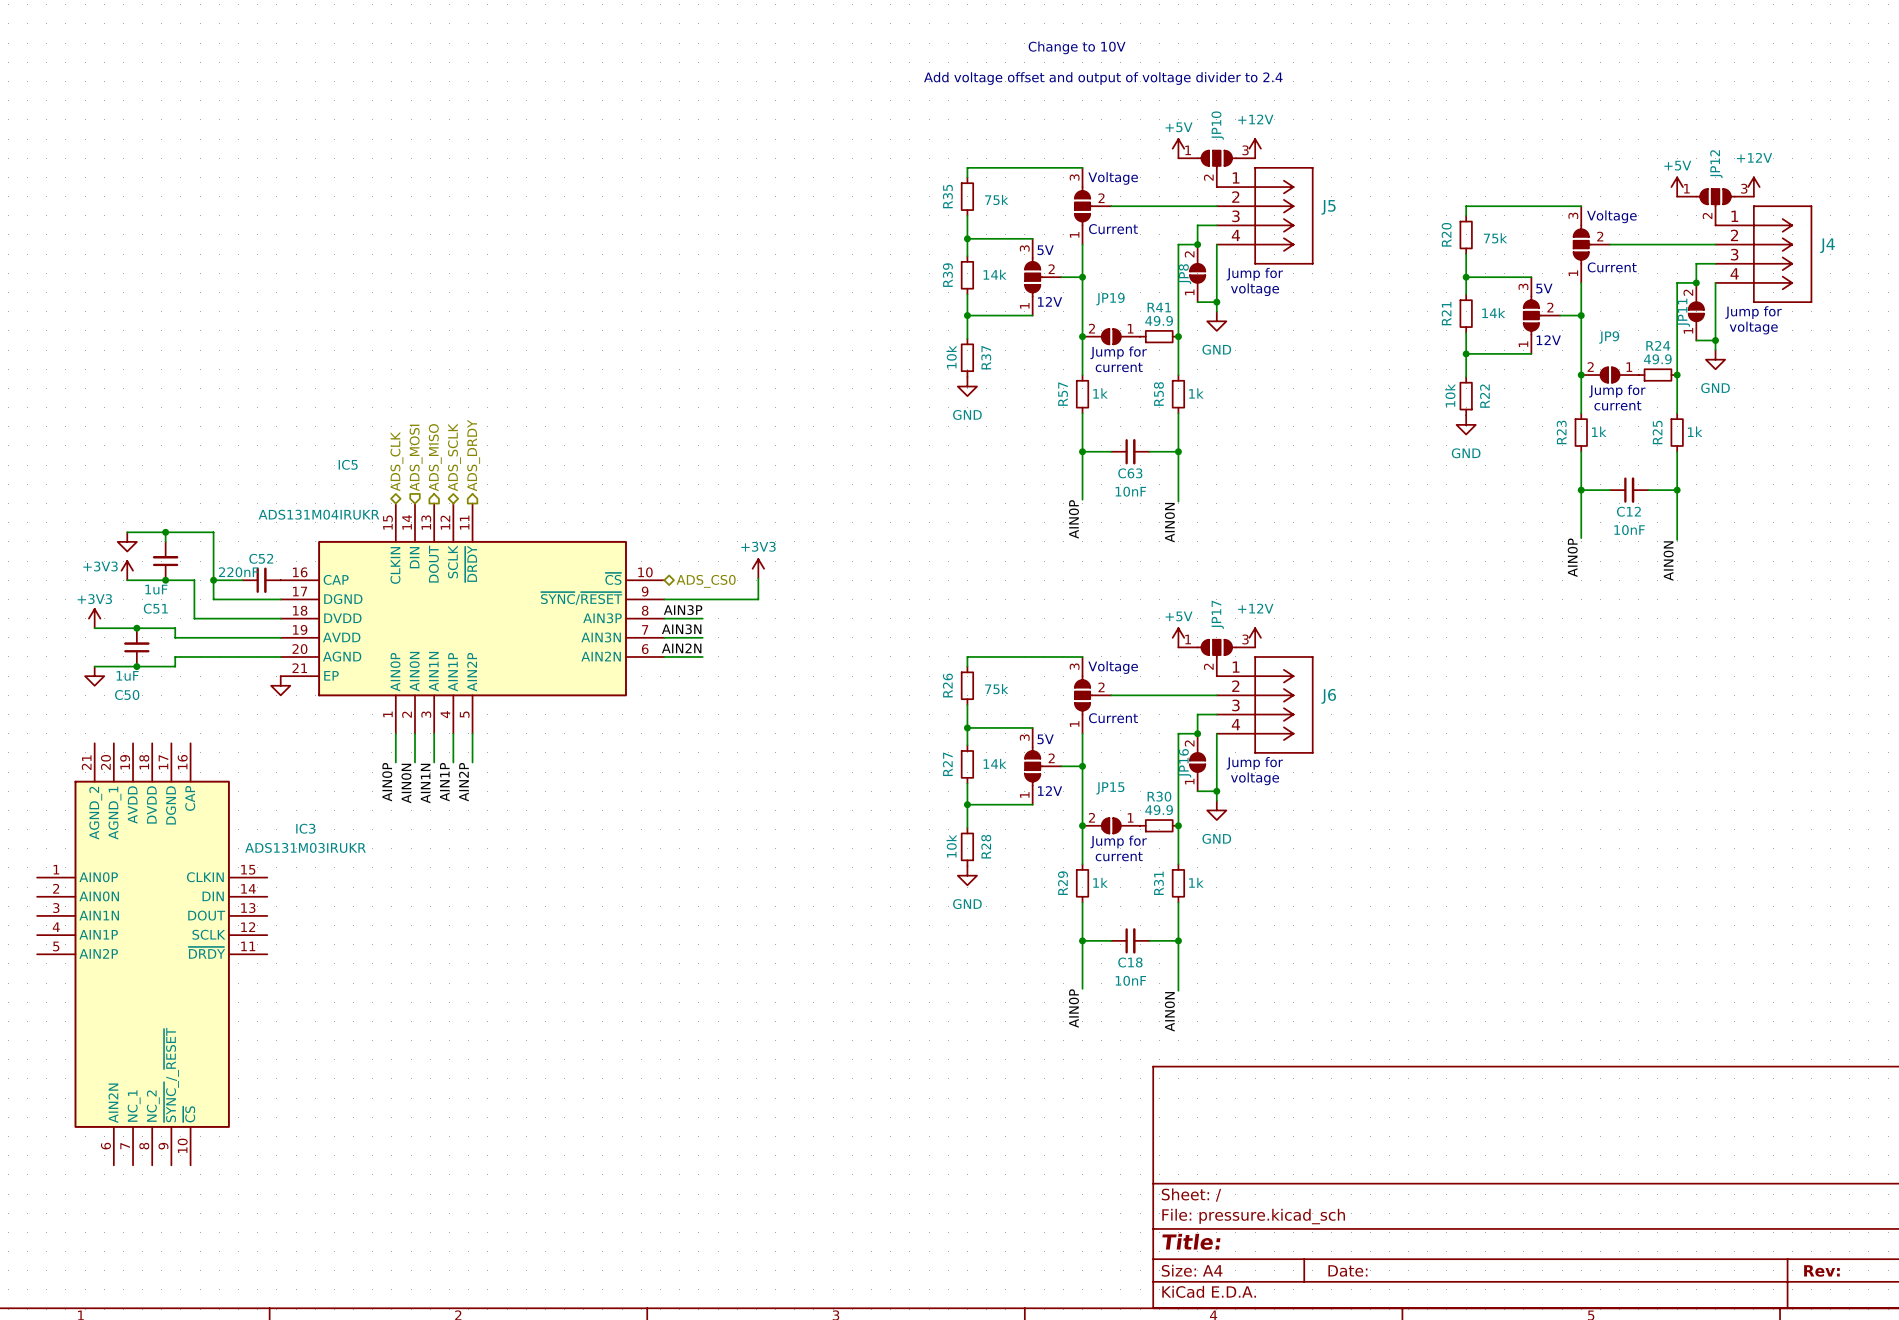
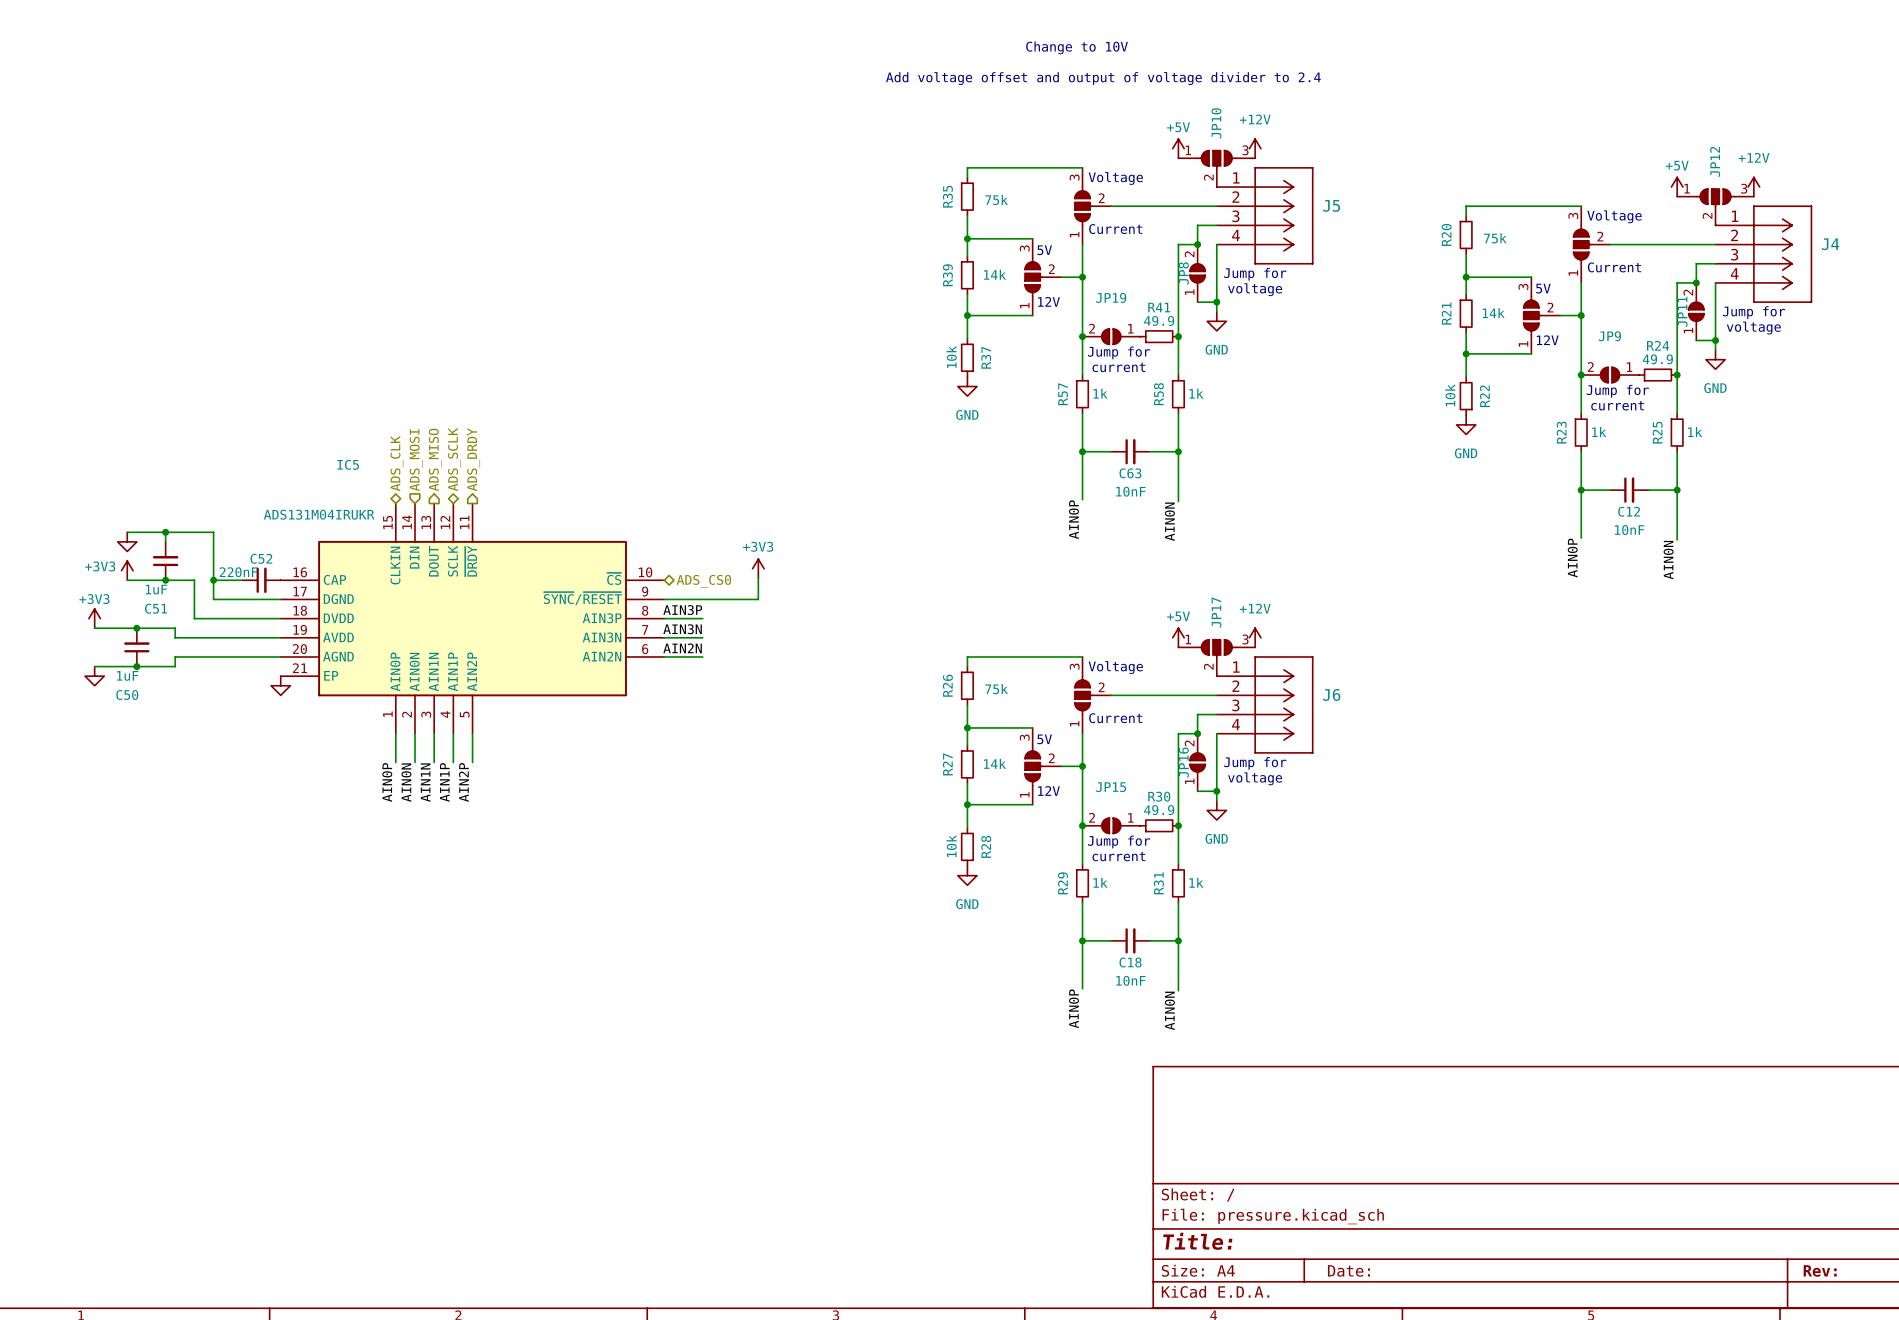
IC3: ADS131M03IRUKR (152, 954) -> none

